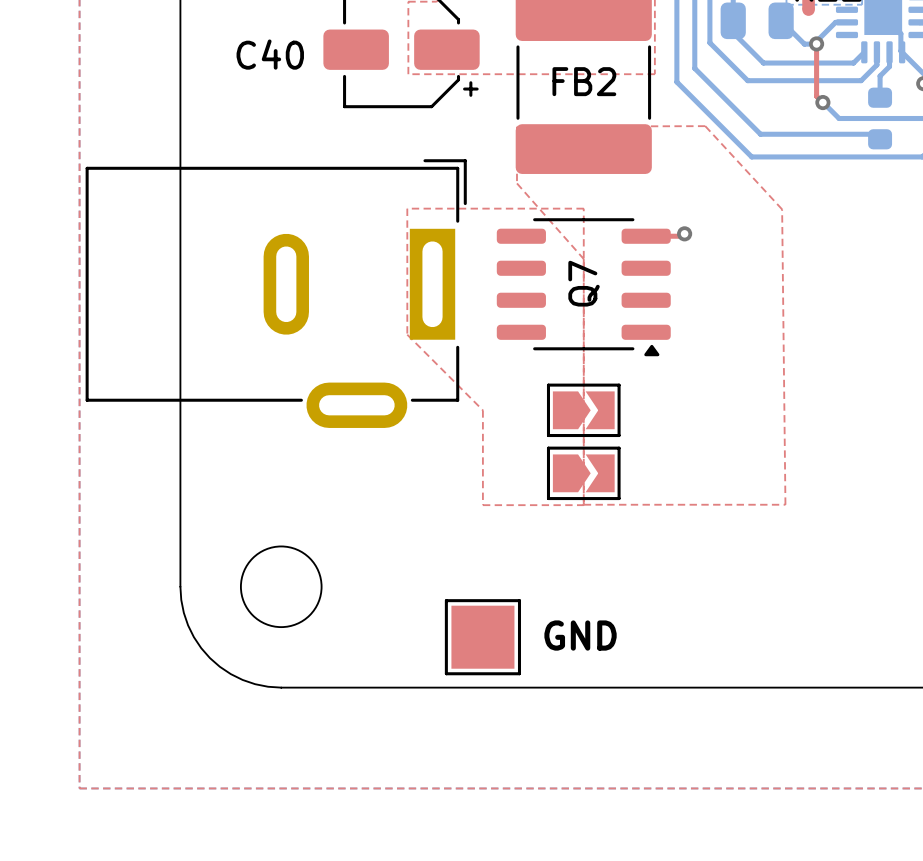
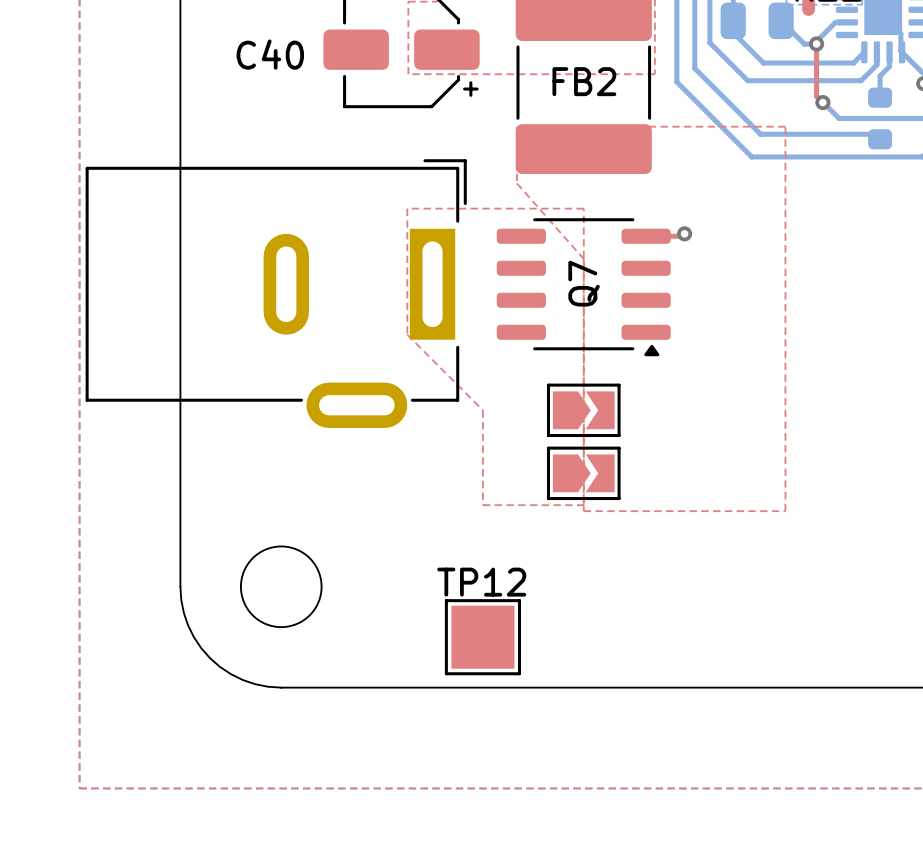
top zone outline: (516, 126) (705, 126) (782, 209) (785, 504) (583, 504) -> (516, 126) (785, 126) (785, 511) (583, 511) (583, 505)
TP12 name: none -> TP12 (481, 582)
text: GND (580, 635) -> none

